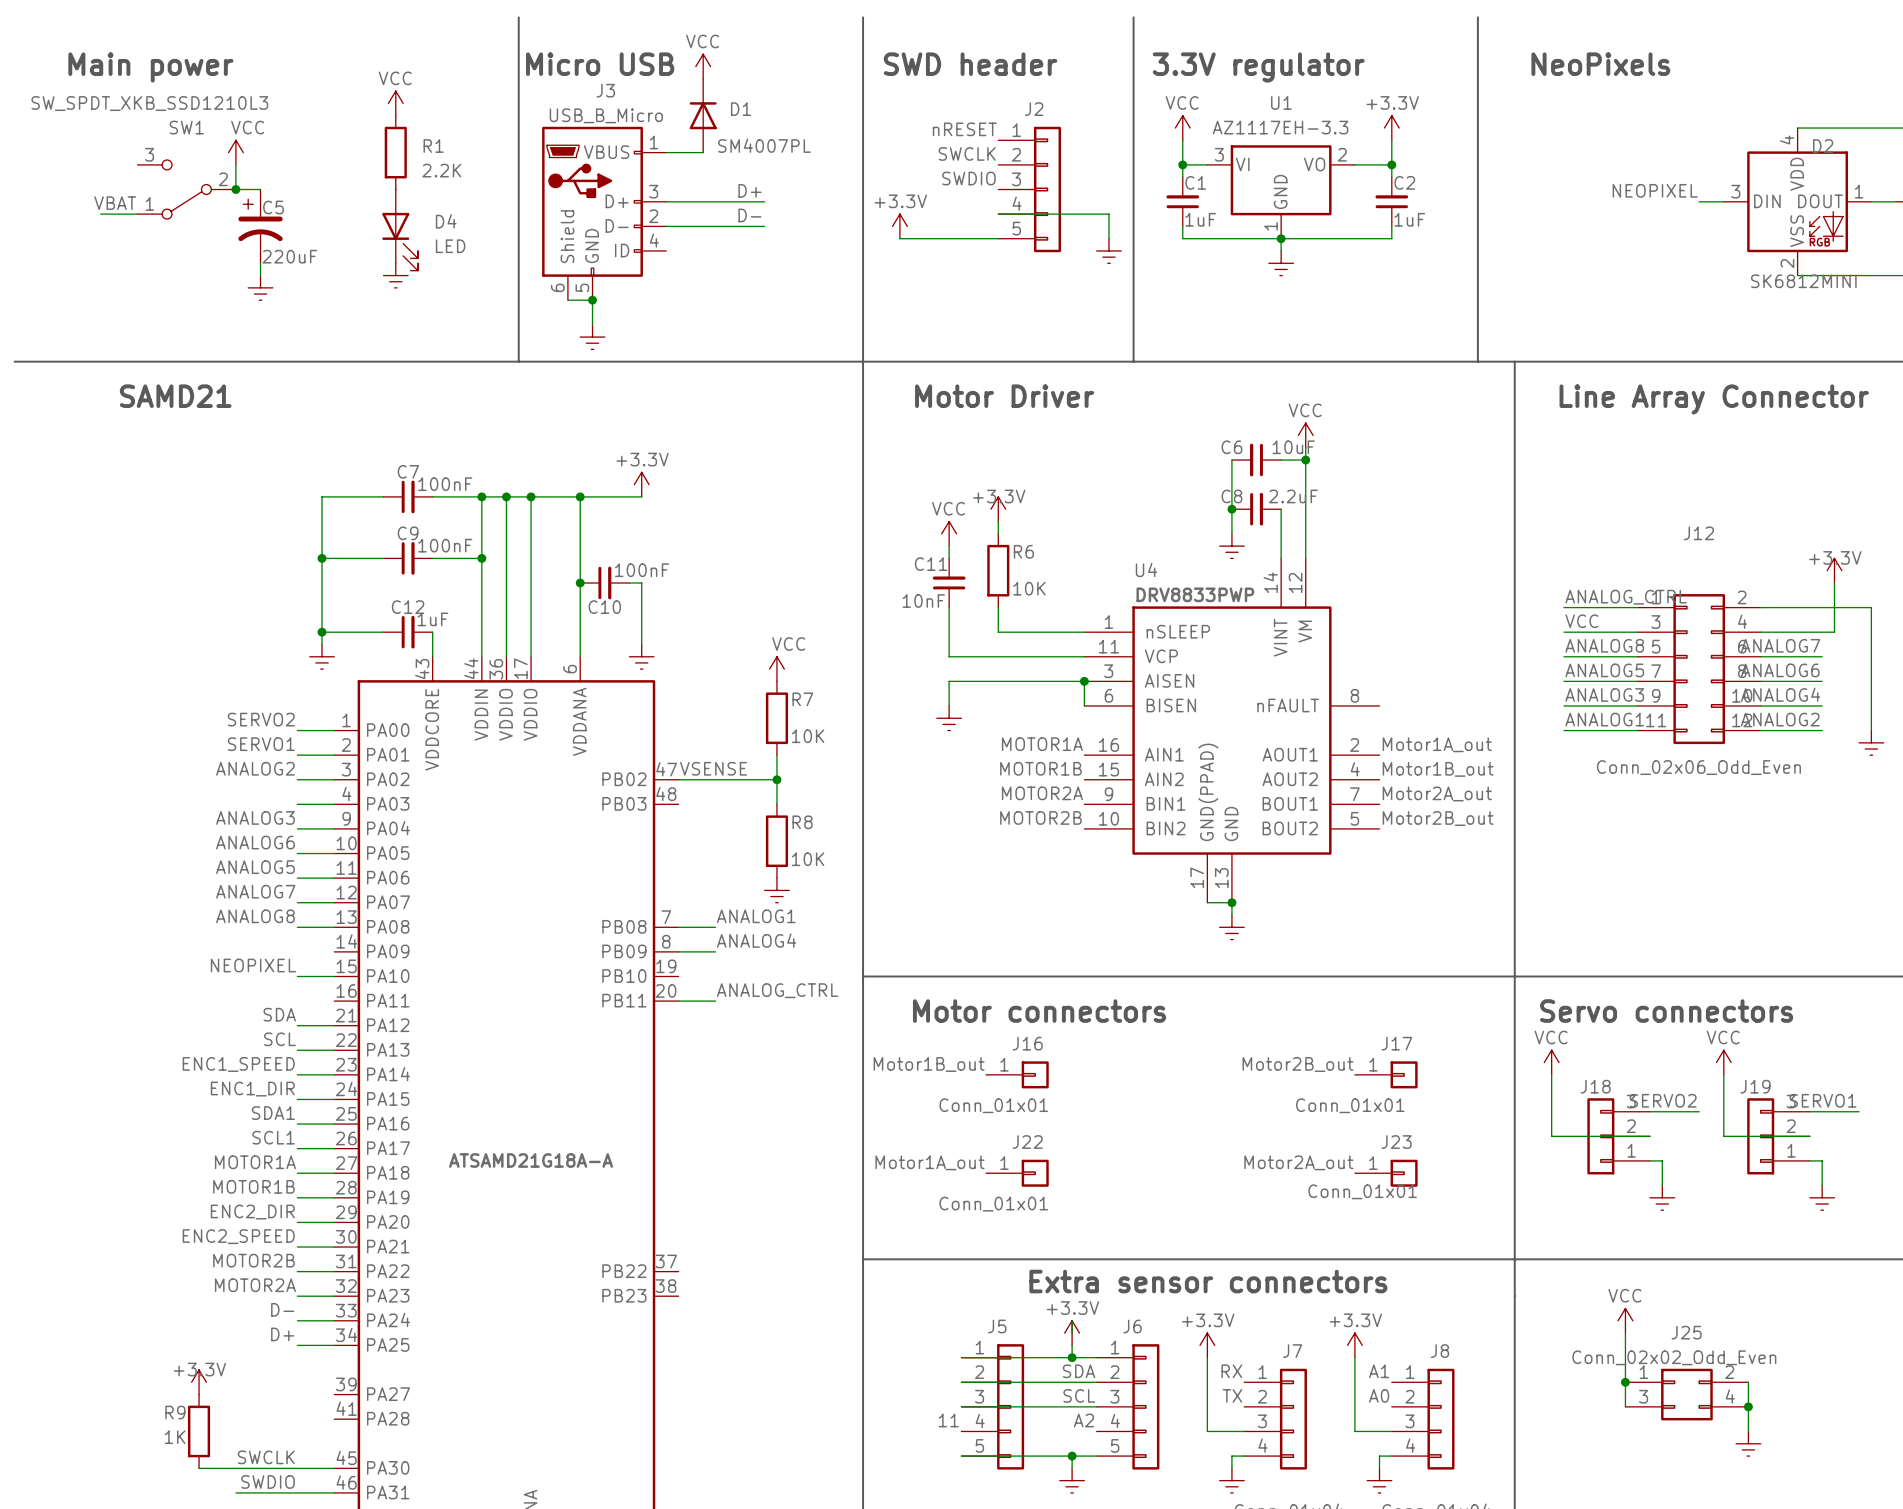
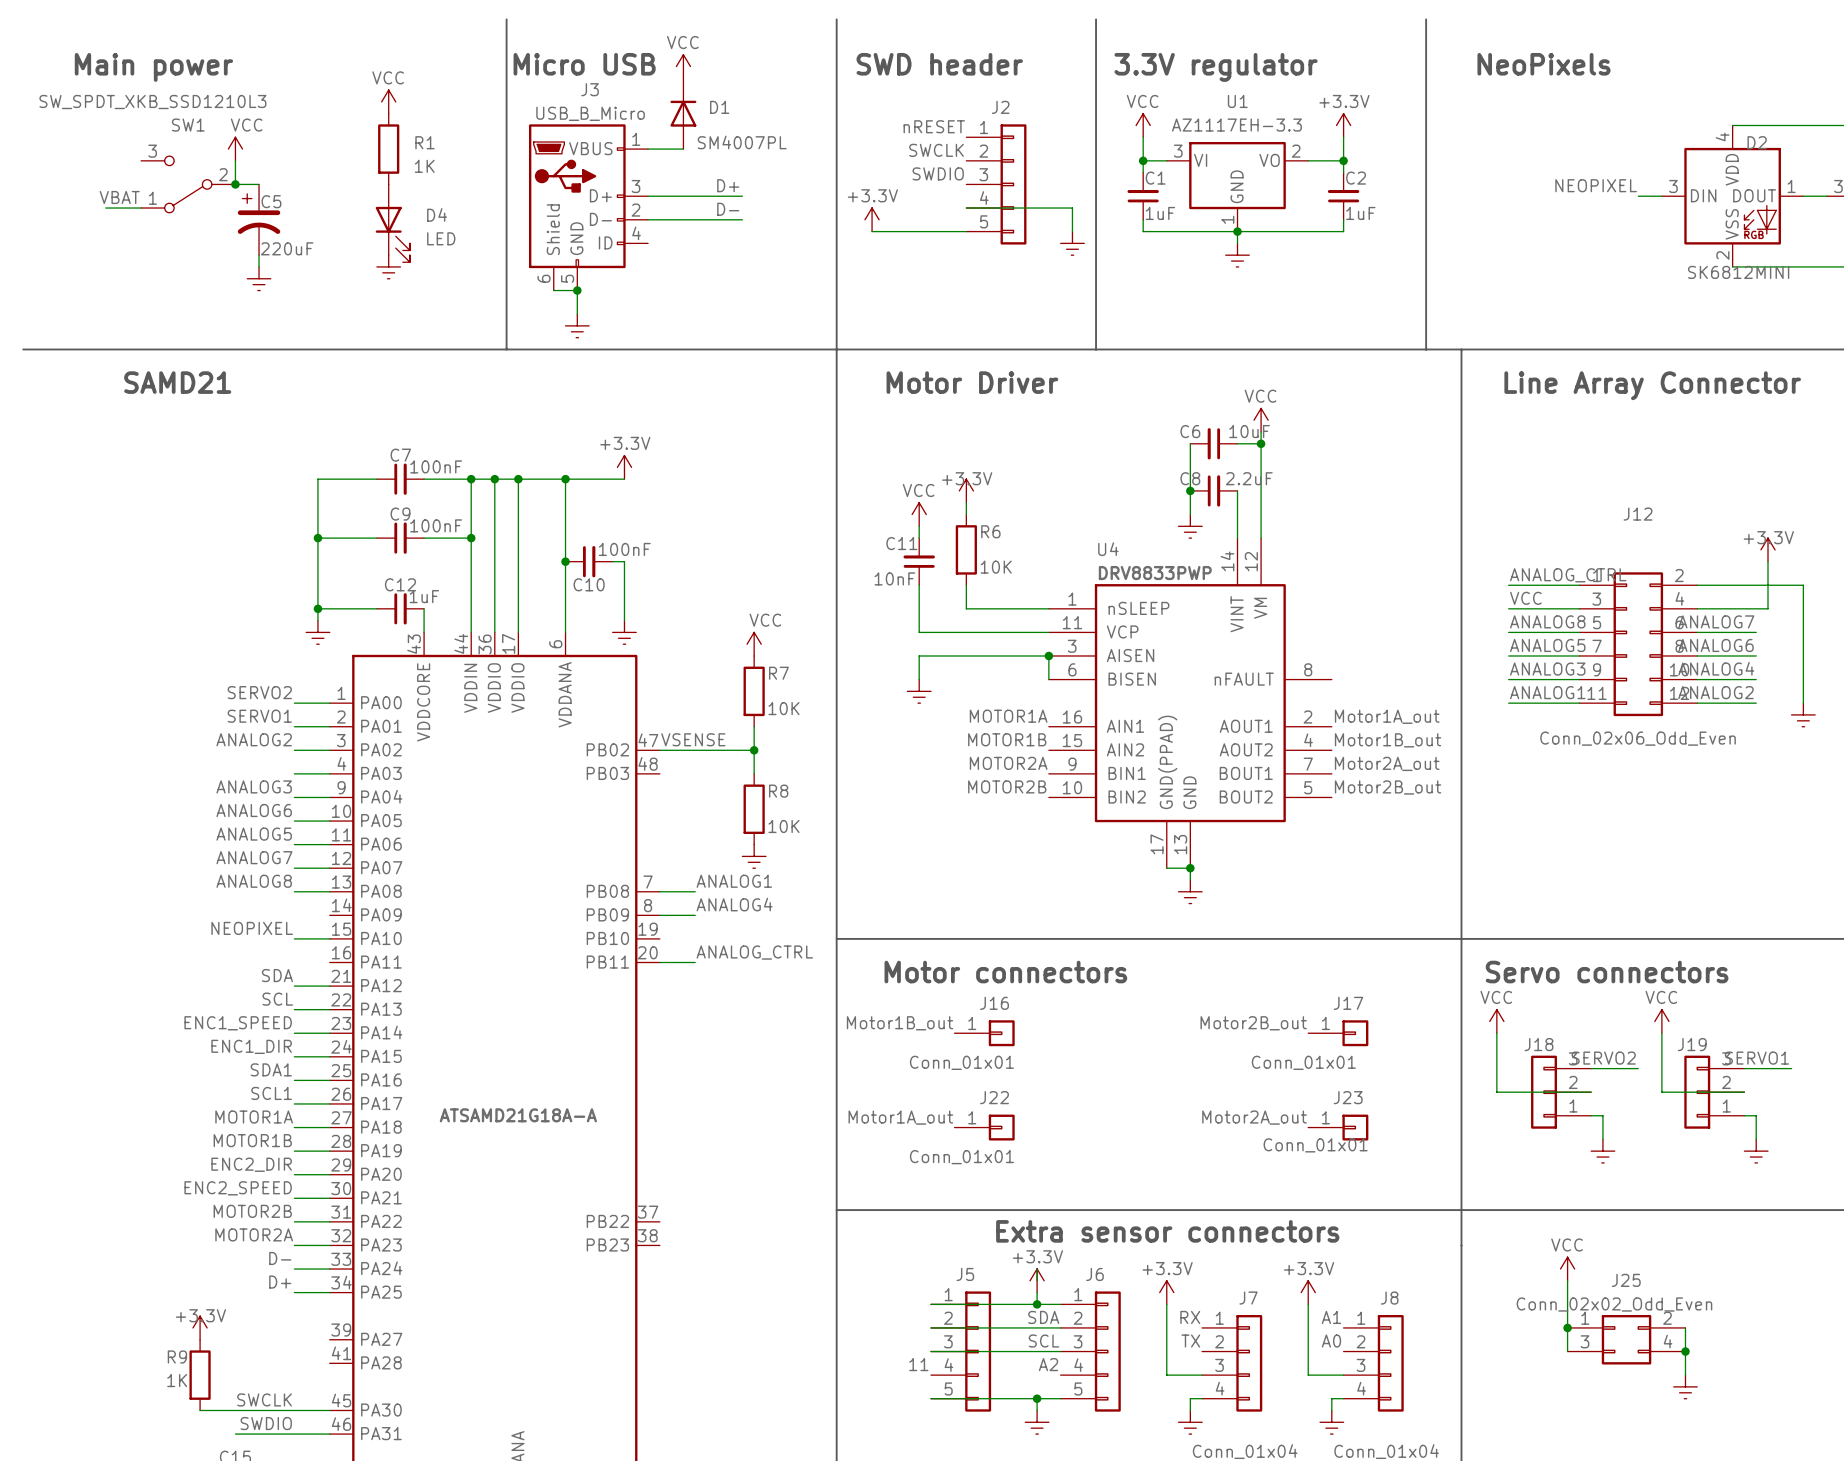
R1 value: 2.2K (441, 170) -> 1K (424, 166)

